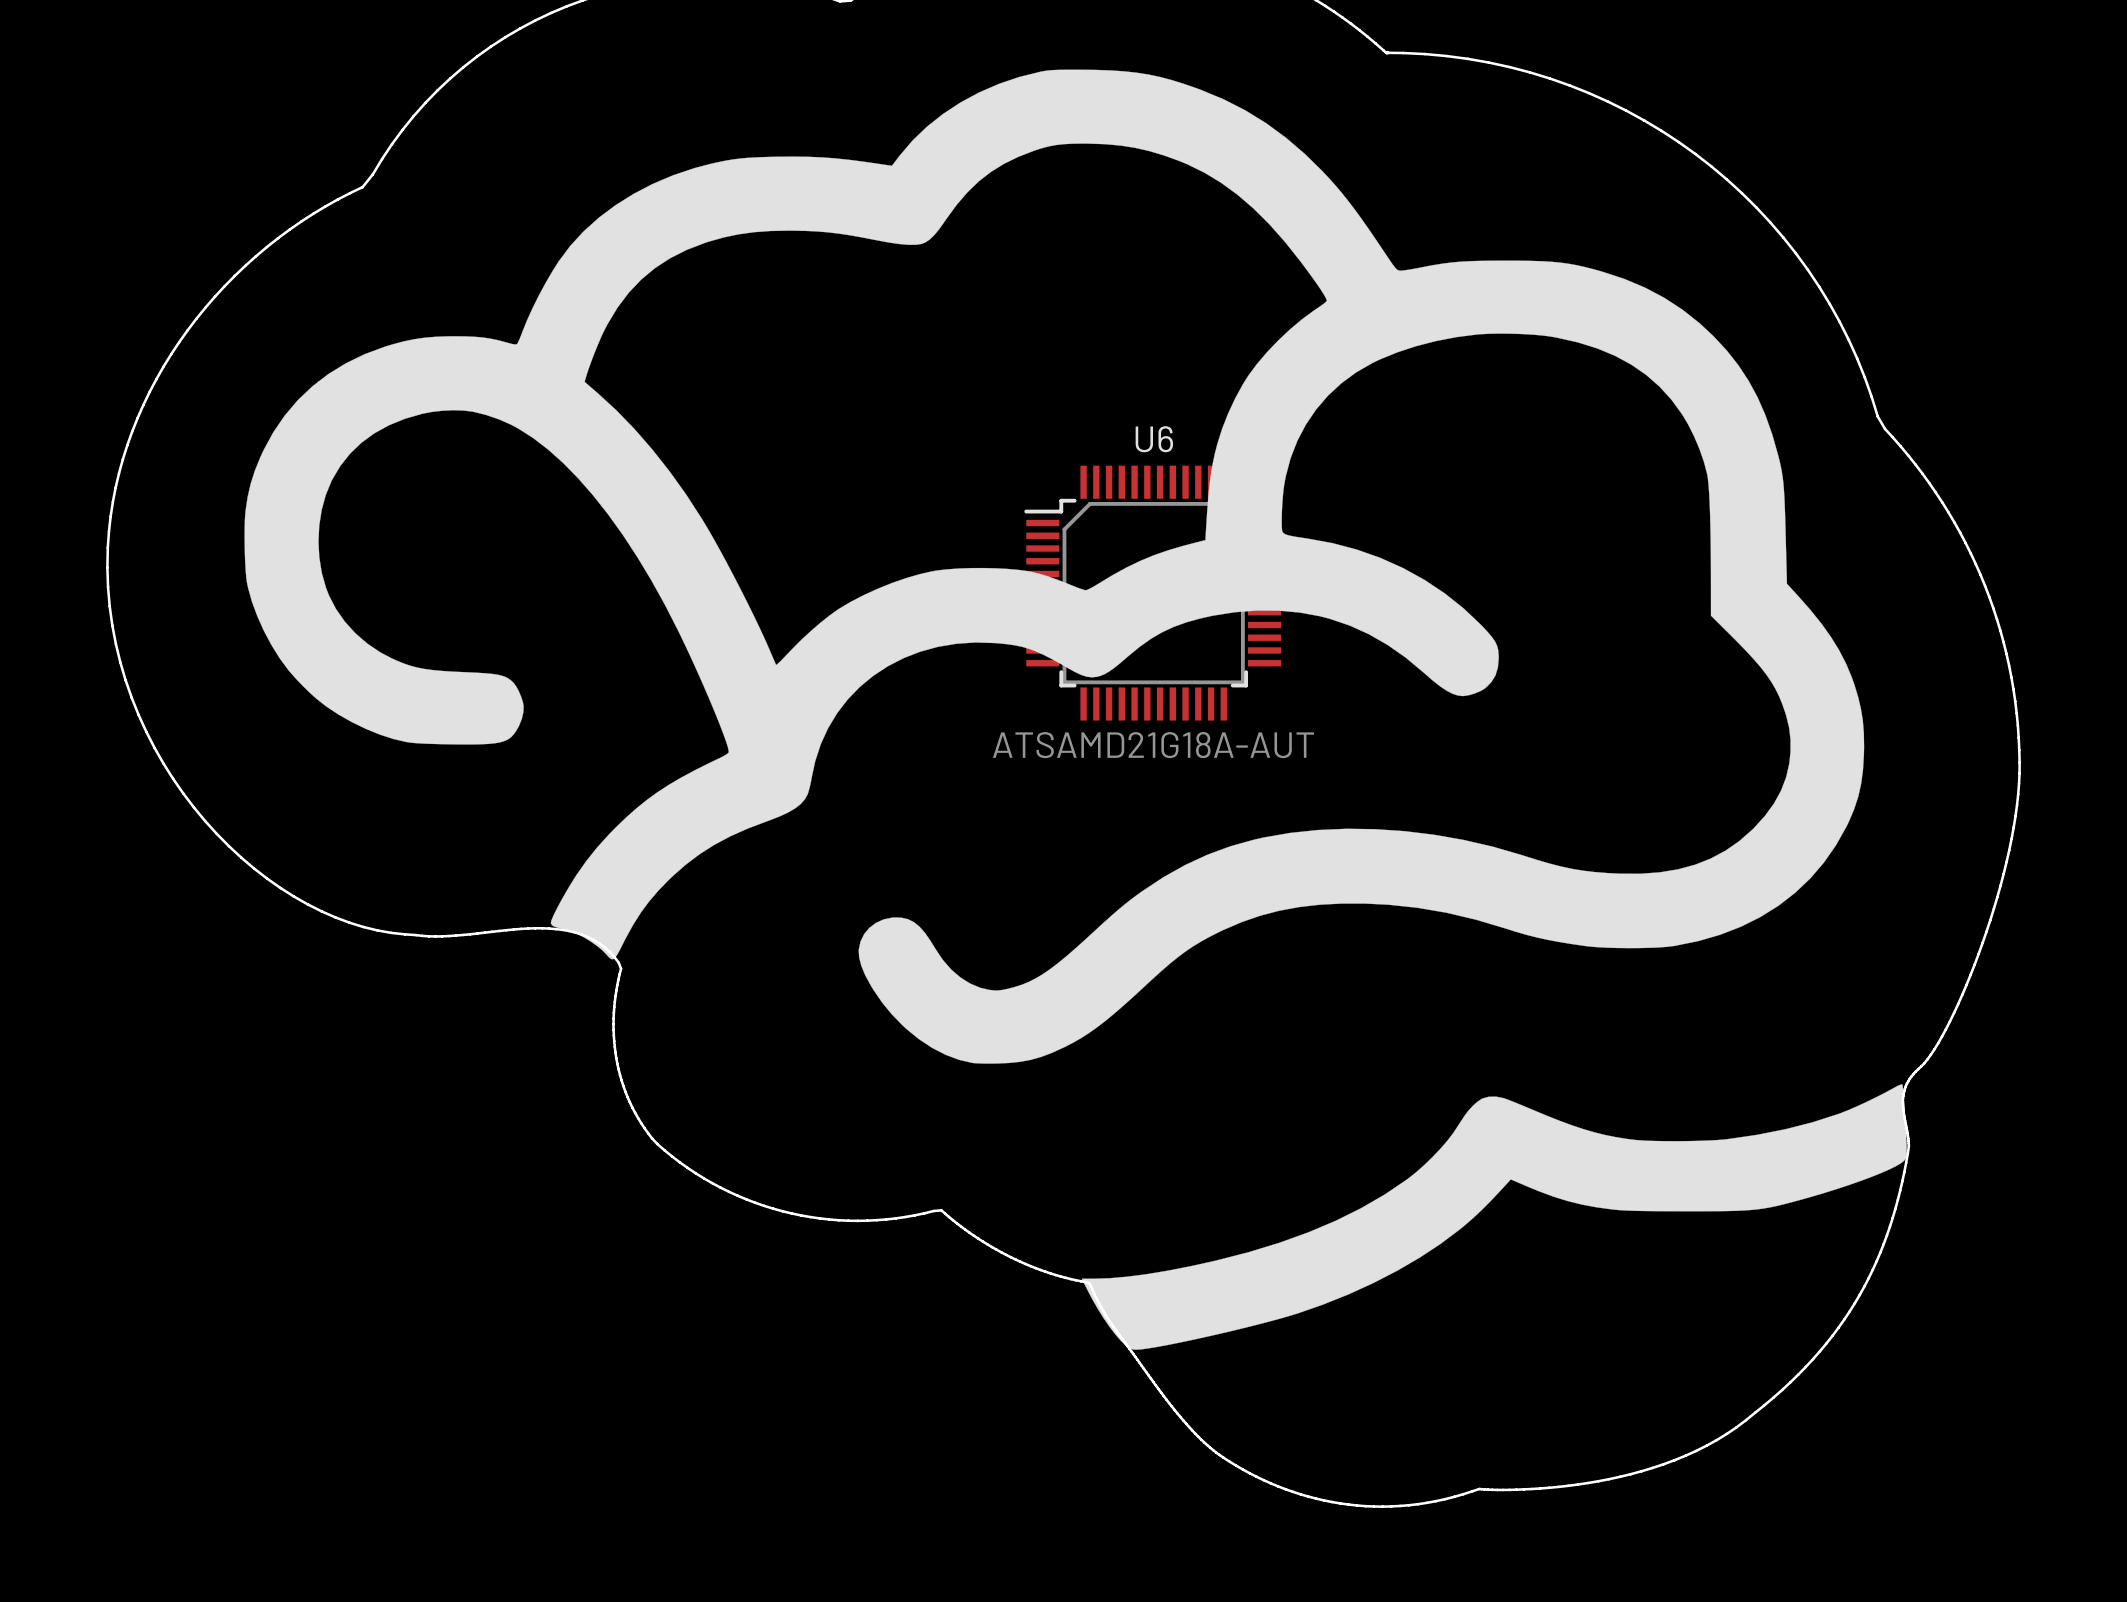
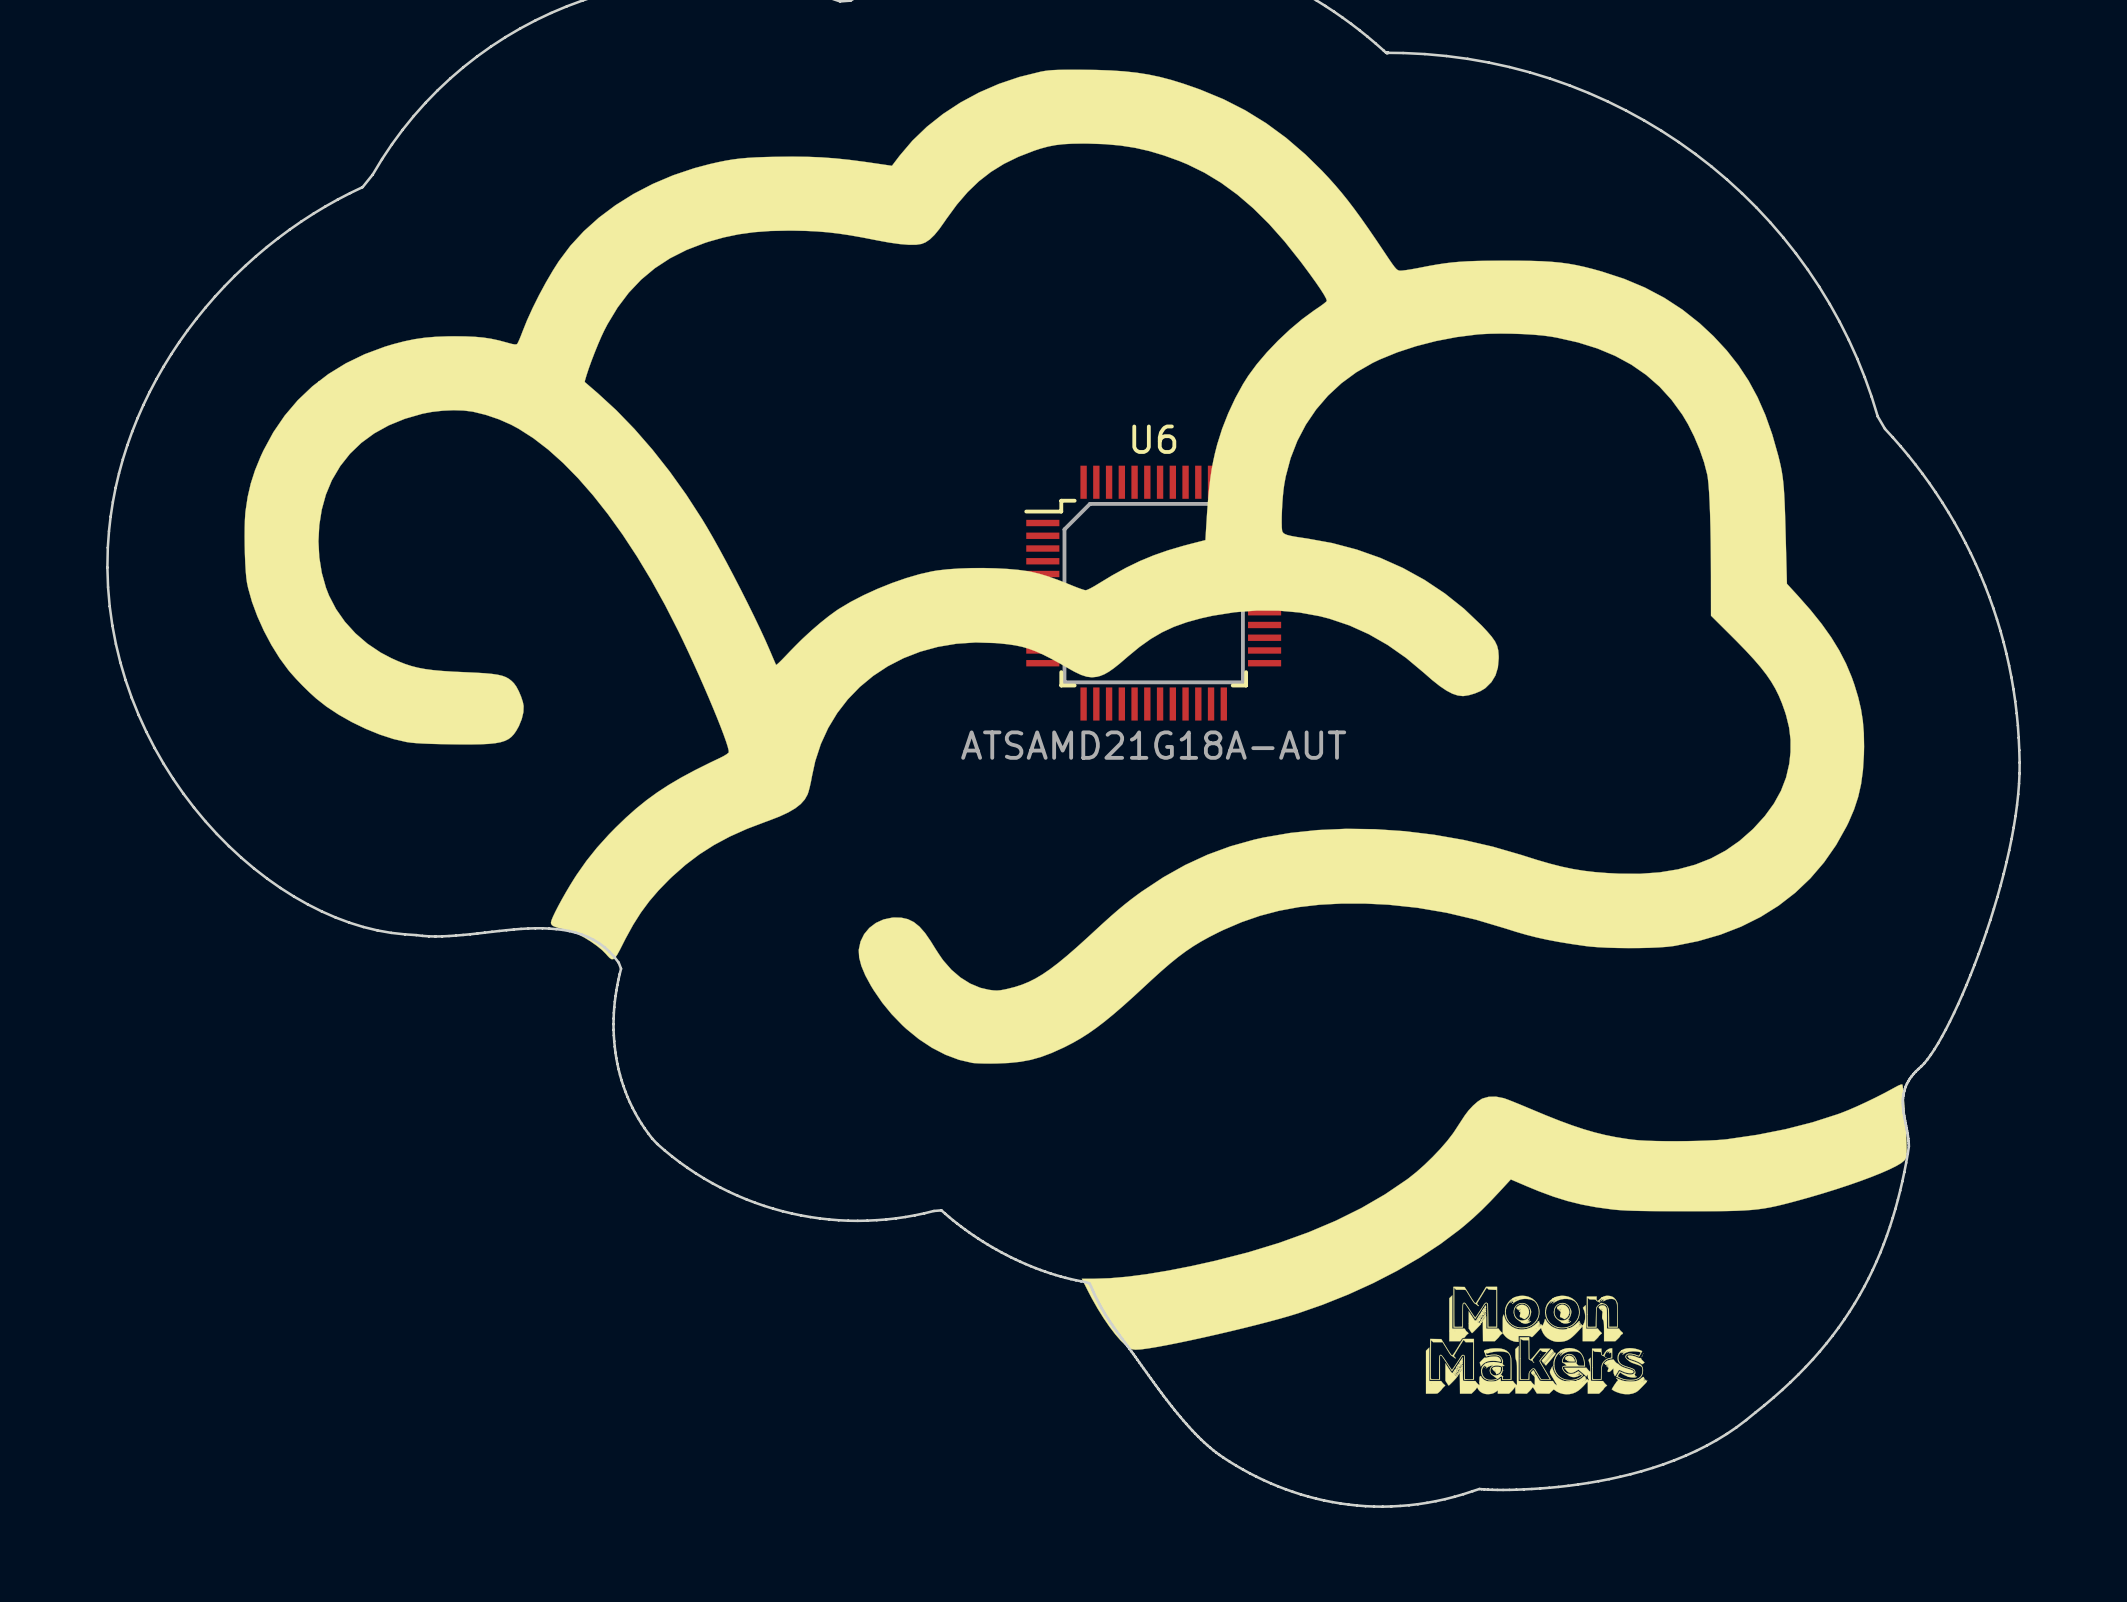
drawing: none -> [1425, 1286, 1648, 1395]

